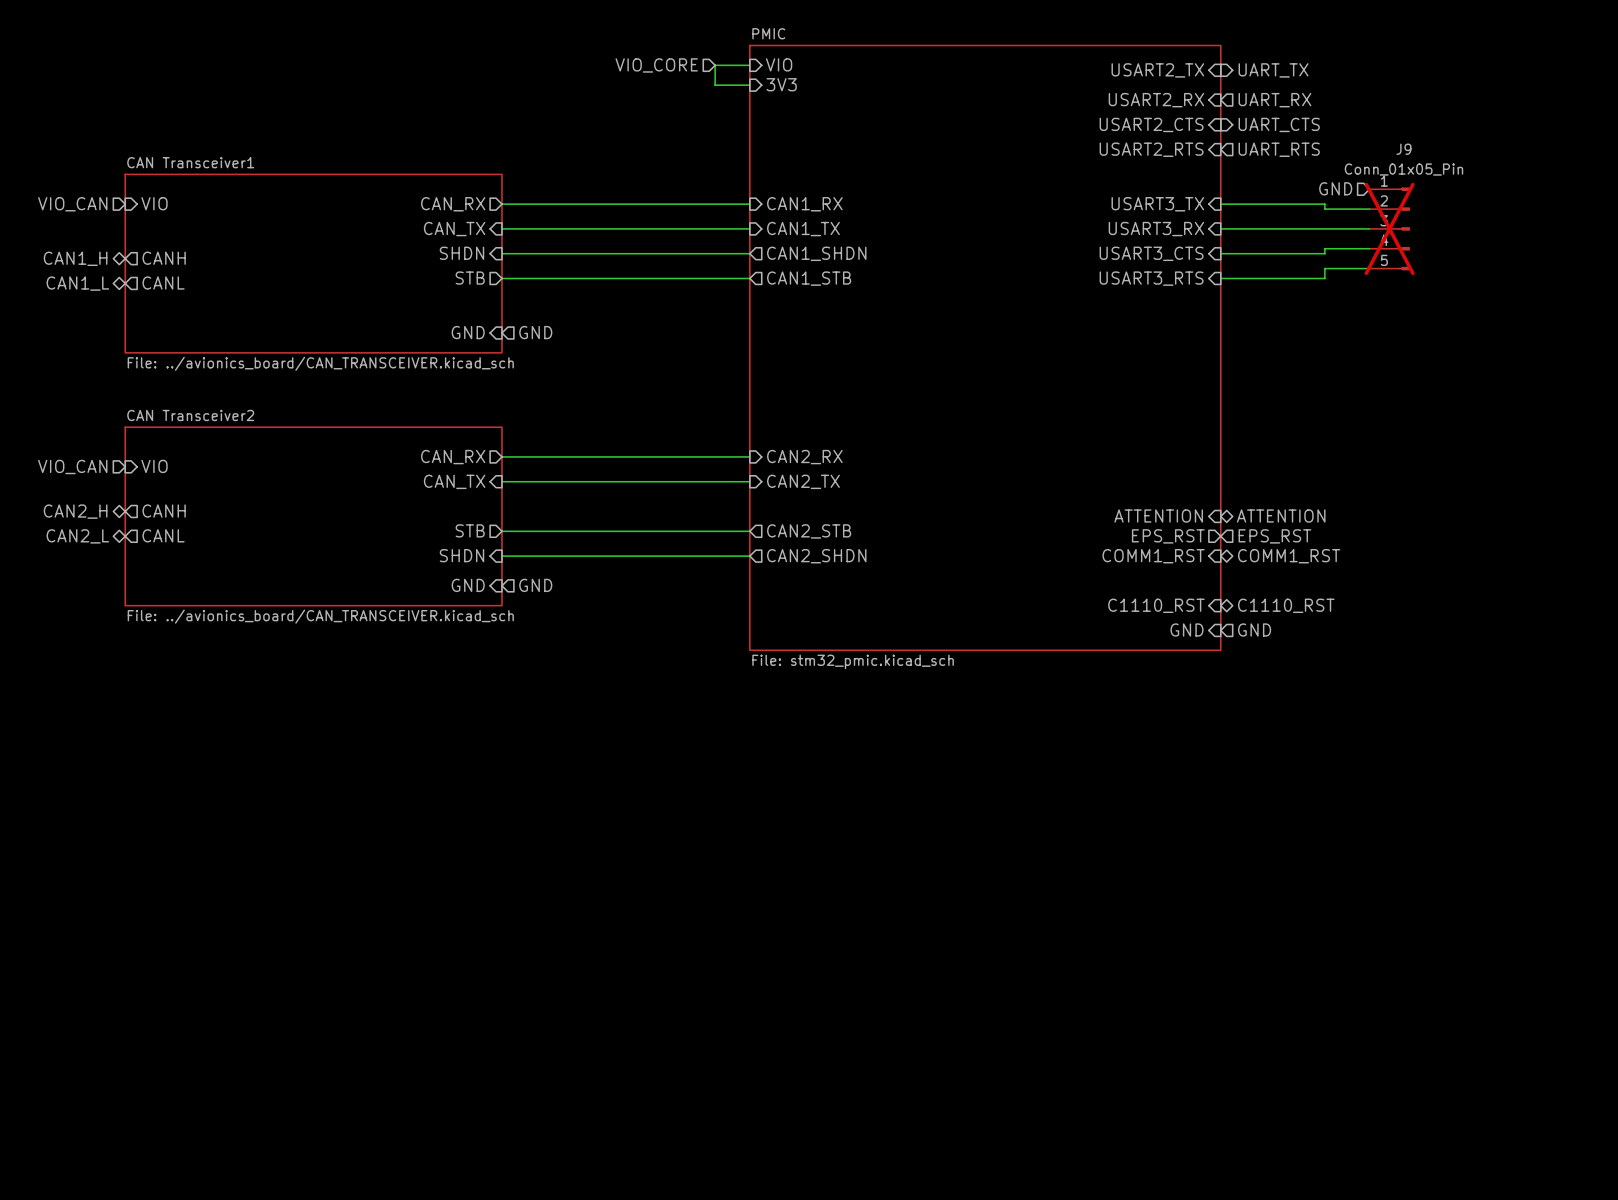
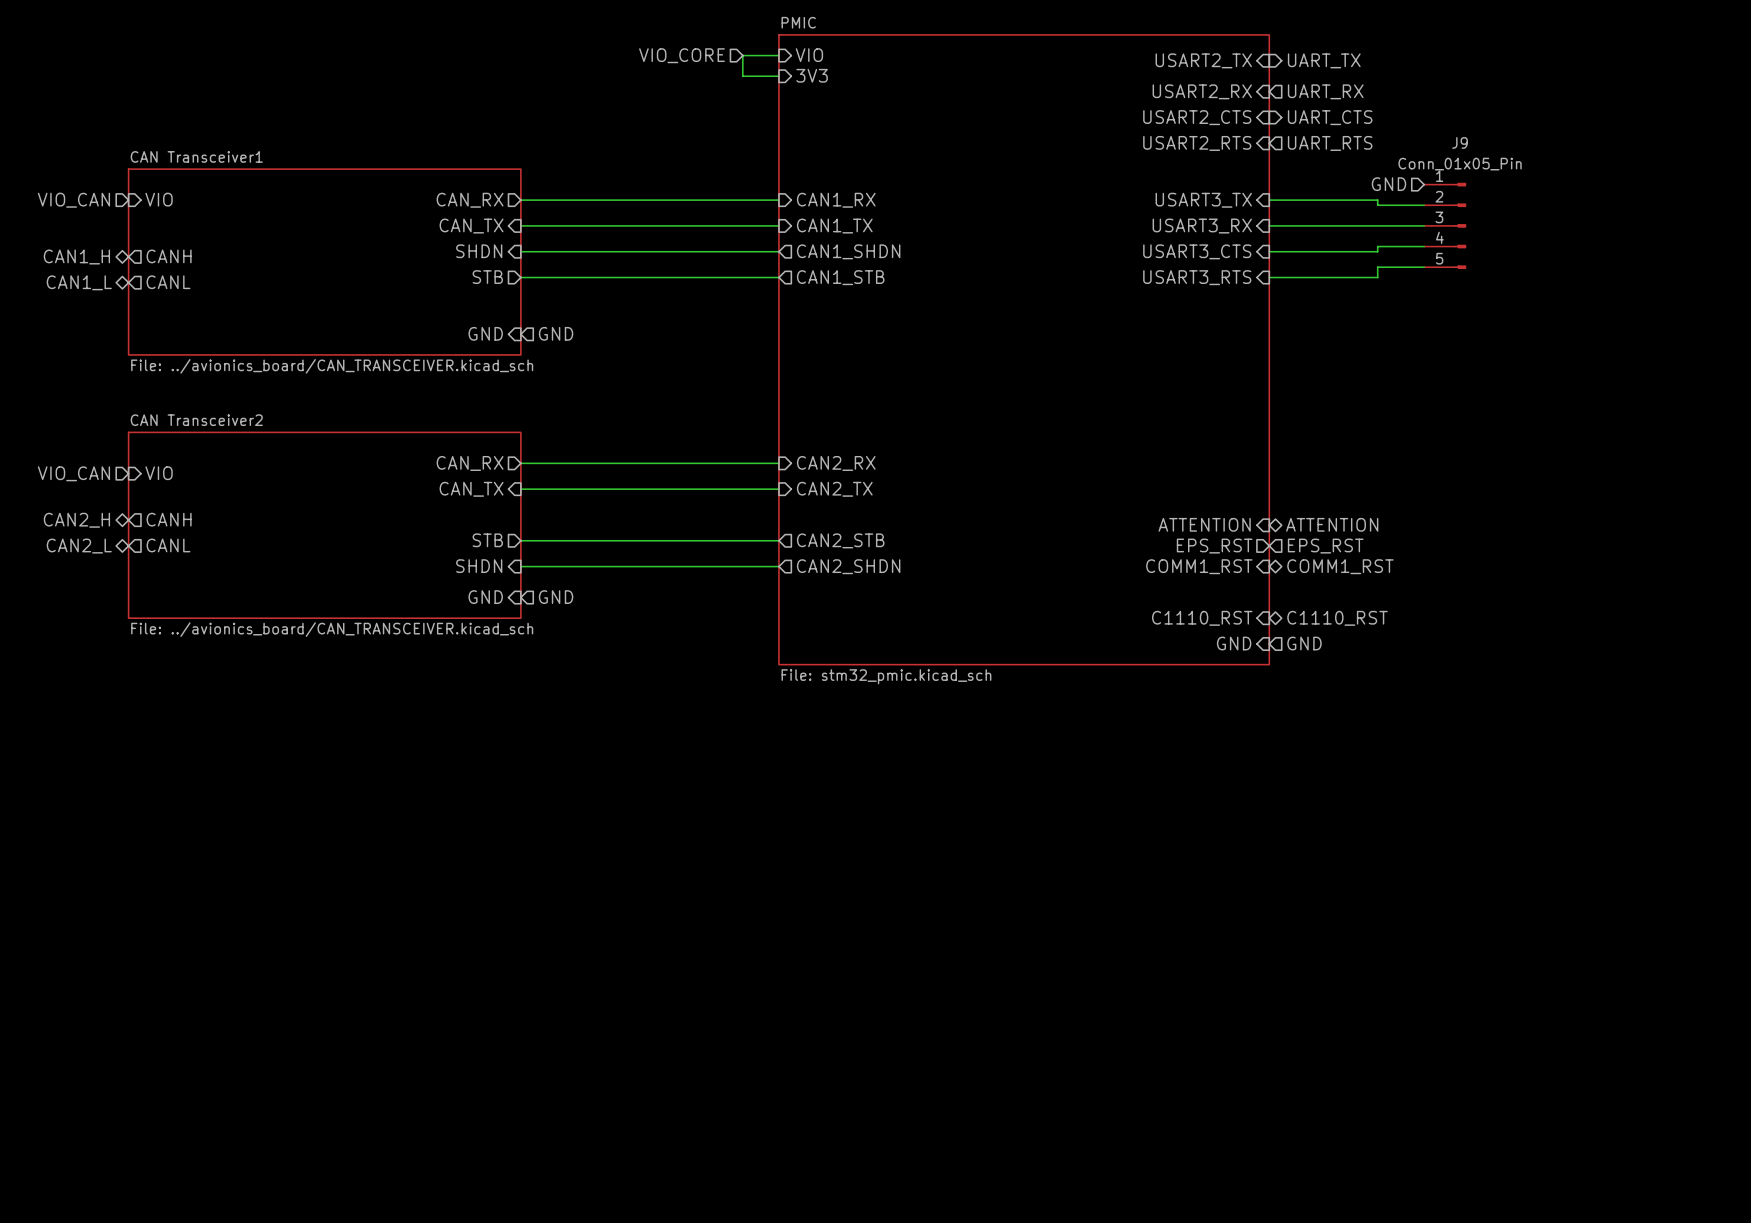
J9 do-not-place cross: (1389, 228) -> none

